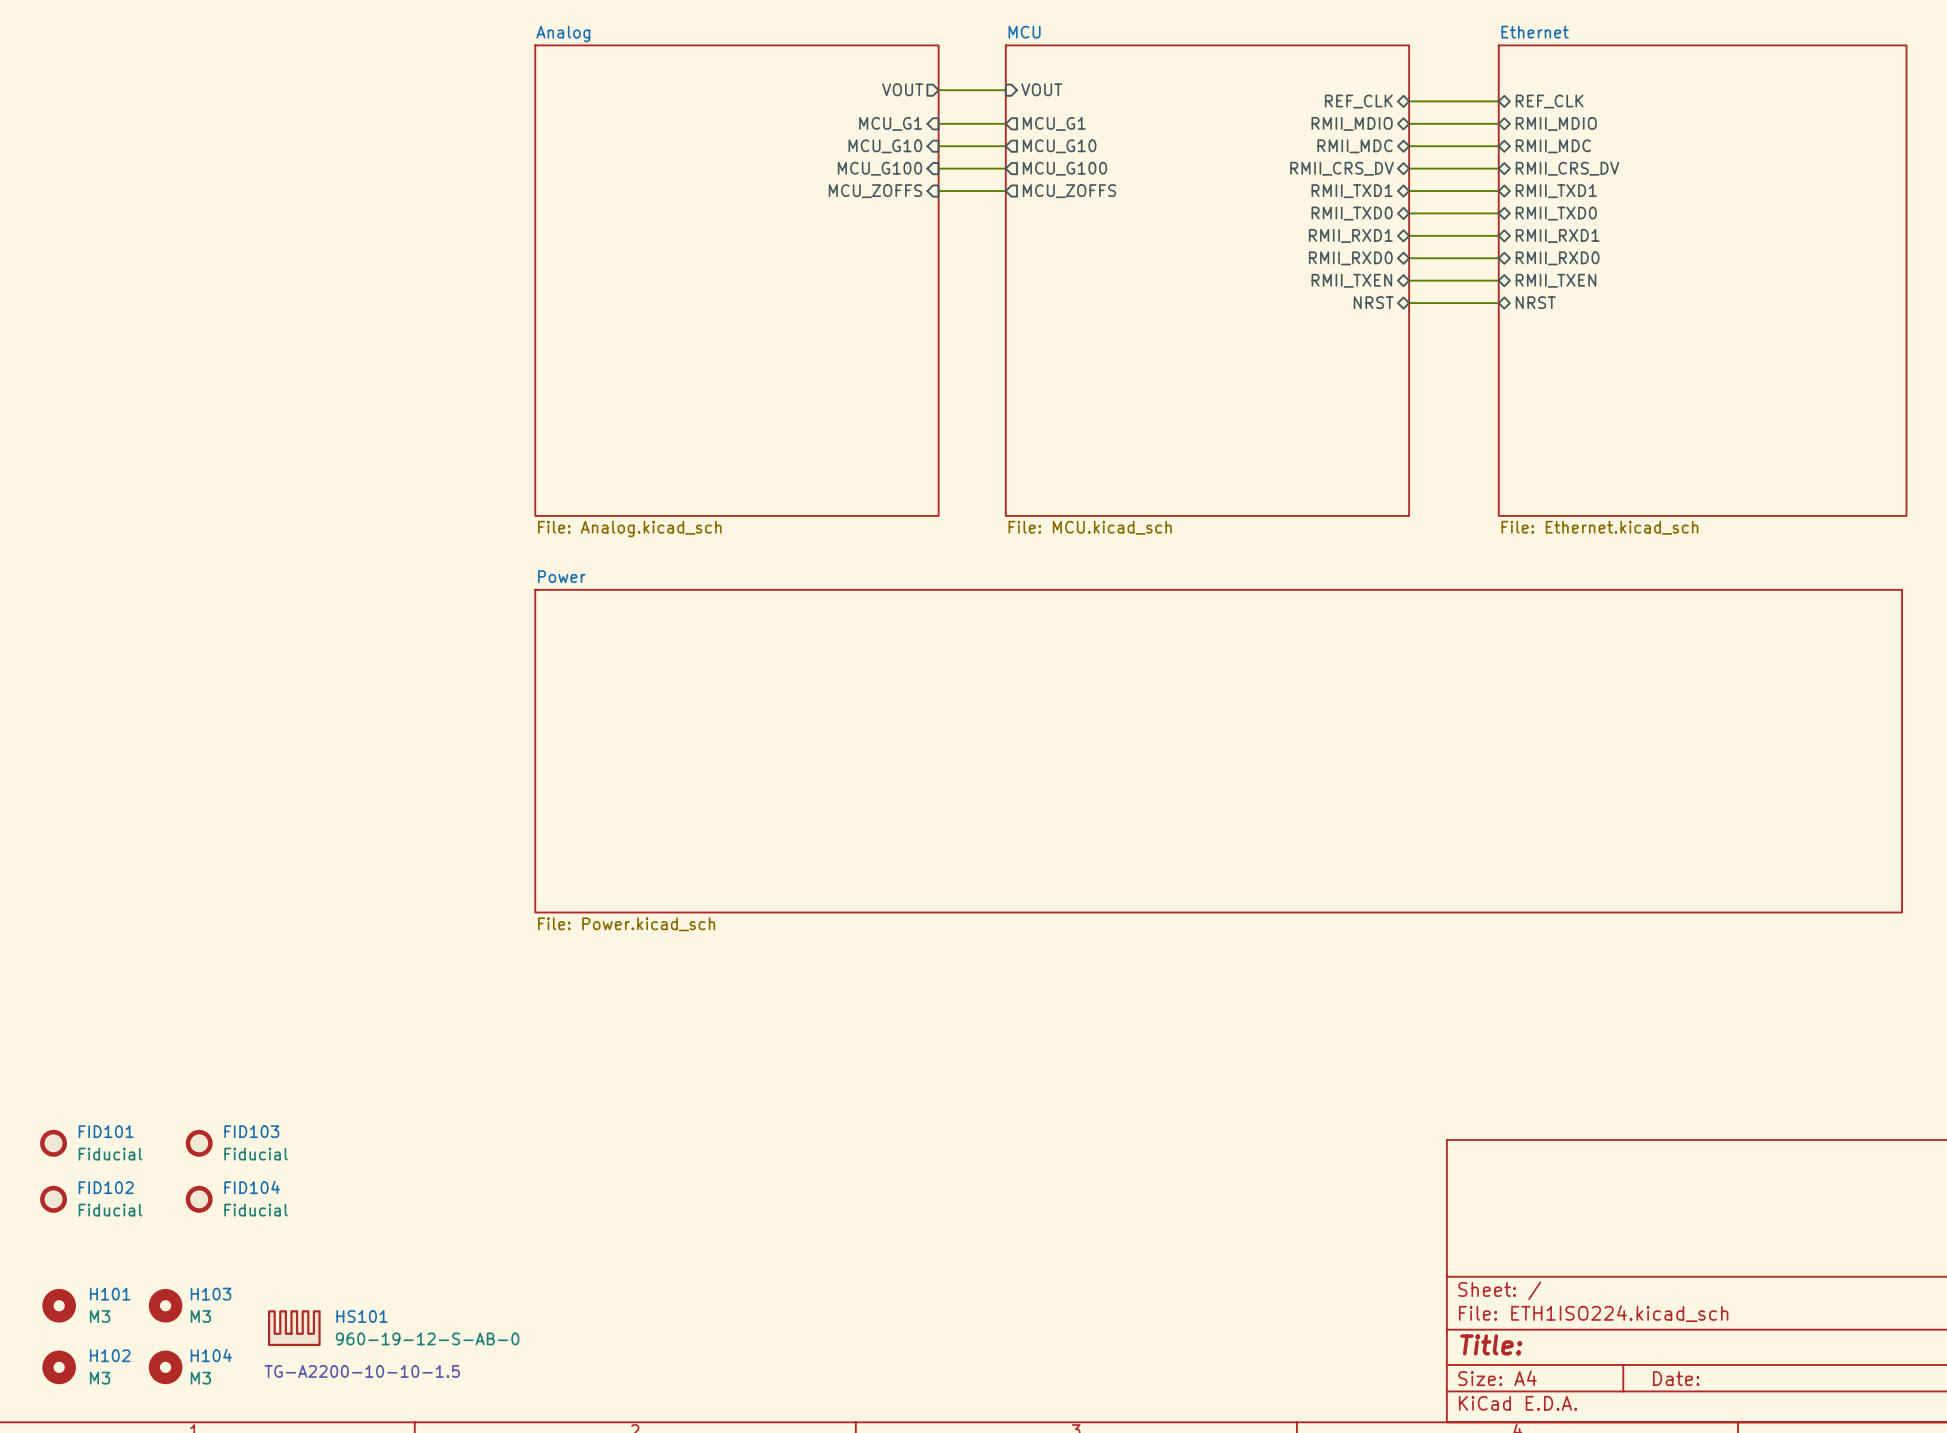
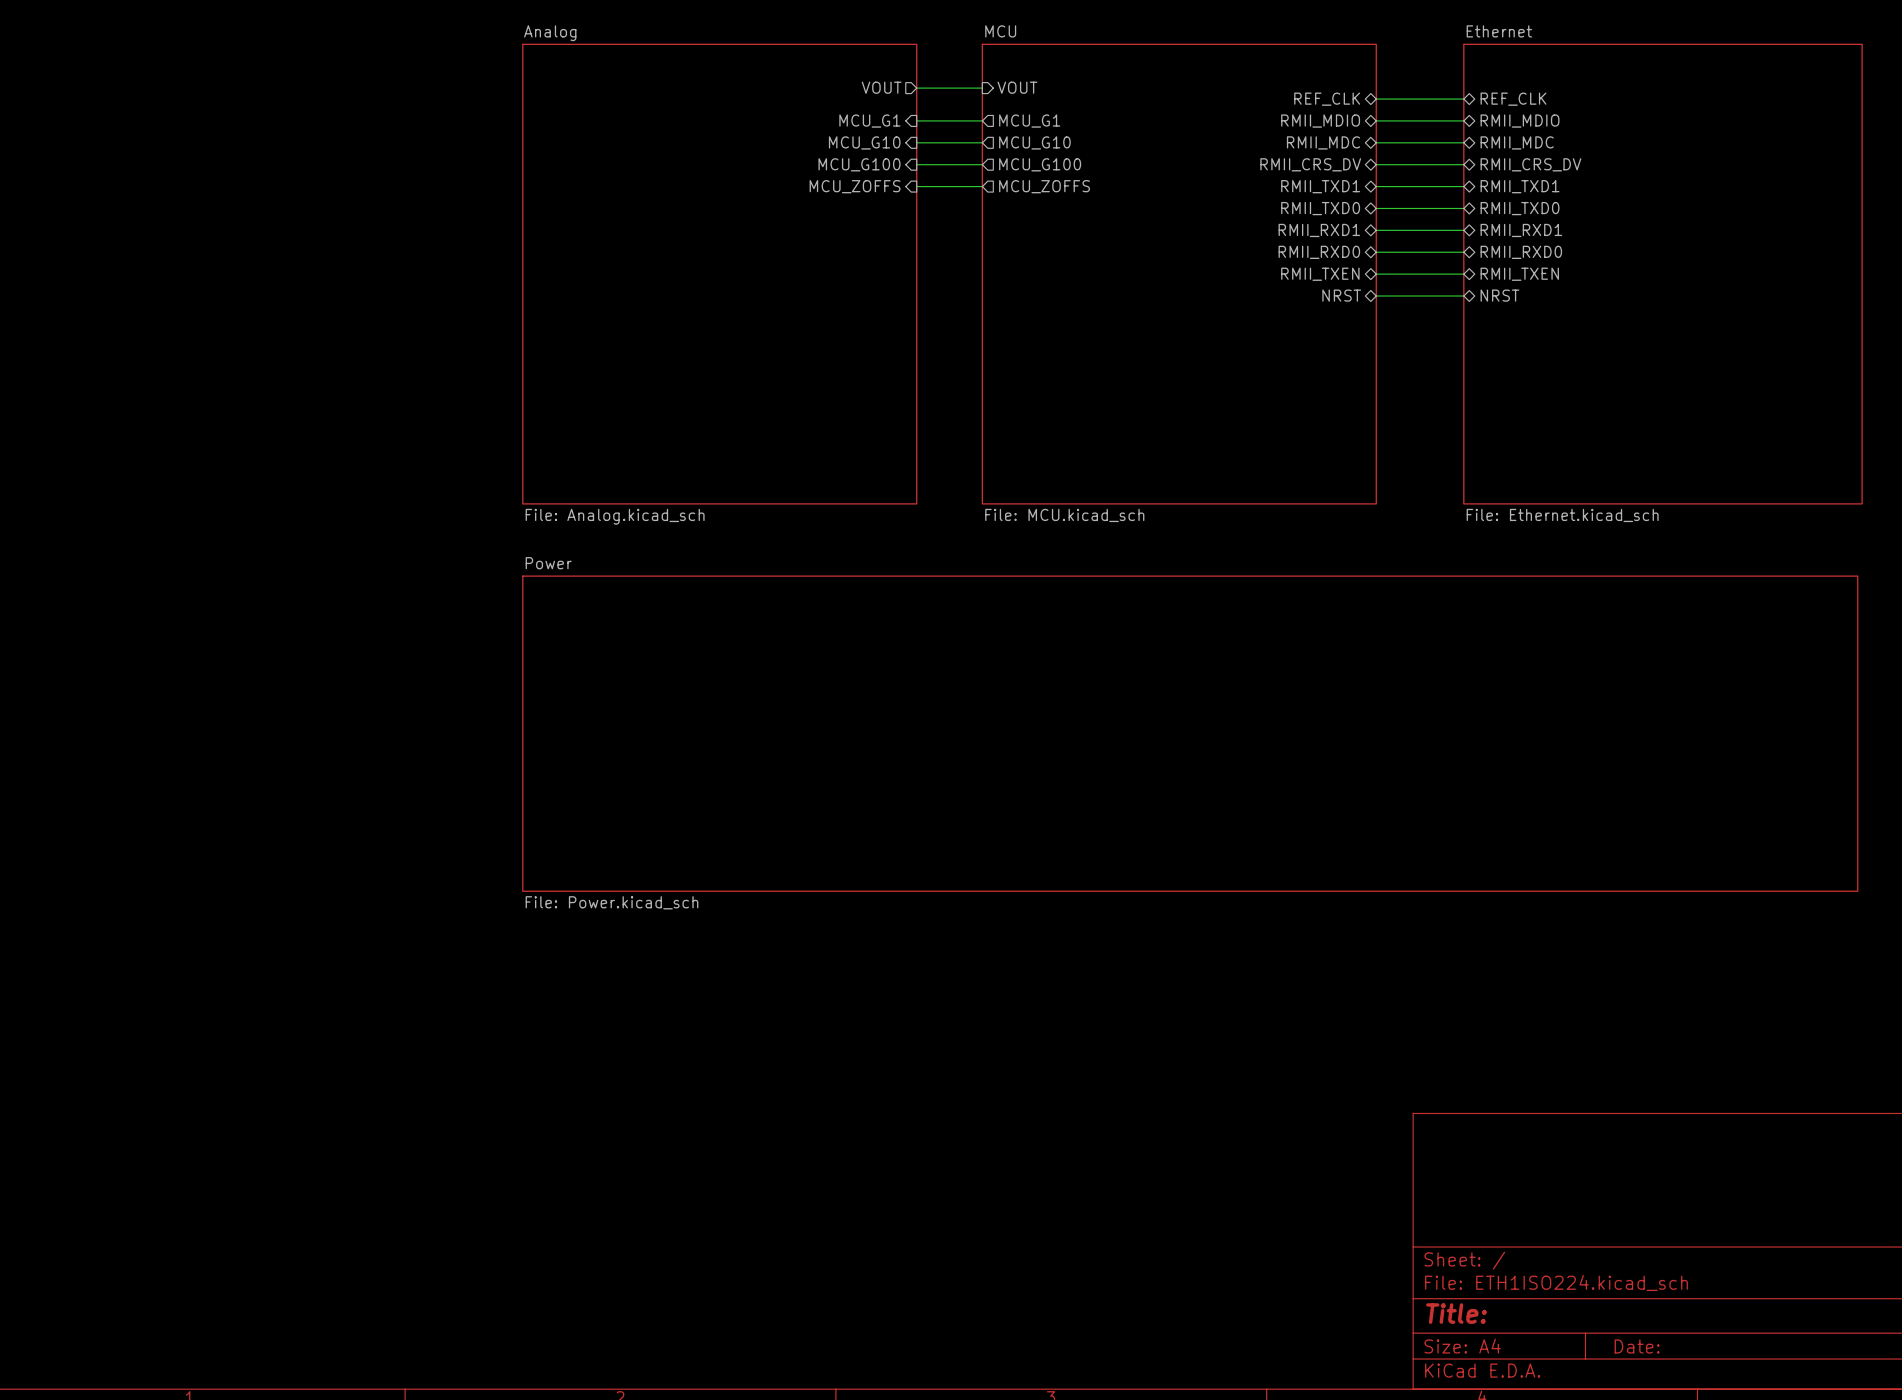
FID101: Fiducial (53, 1143) -> none
FID103: Fiducial (199, 1143) -> none
FID102: Fiducial (53, 1199) -> none
FID104: Fiducial (199, 1199) -> none
H101: M3 (59, 1305) -> none
H103: M3 (165, 1305) -> none
HS101: 960-19-12-S-AB-0 (294, 1328) -> none
H102: M3 (59, 1367) -> none
H104: M3 (165, 1367) -> none
text: TG-A2200-10-10-1.5 (362, 1371) -> none

